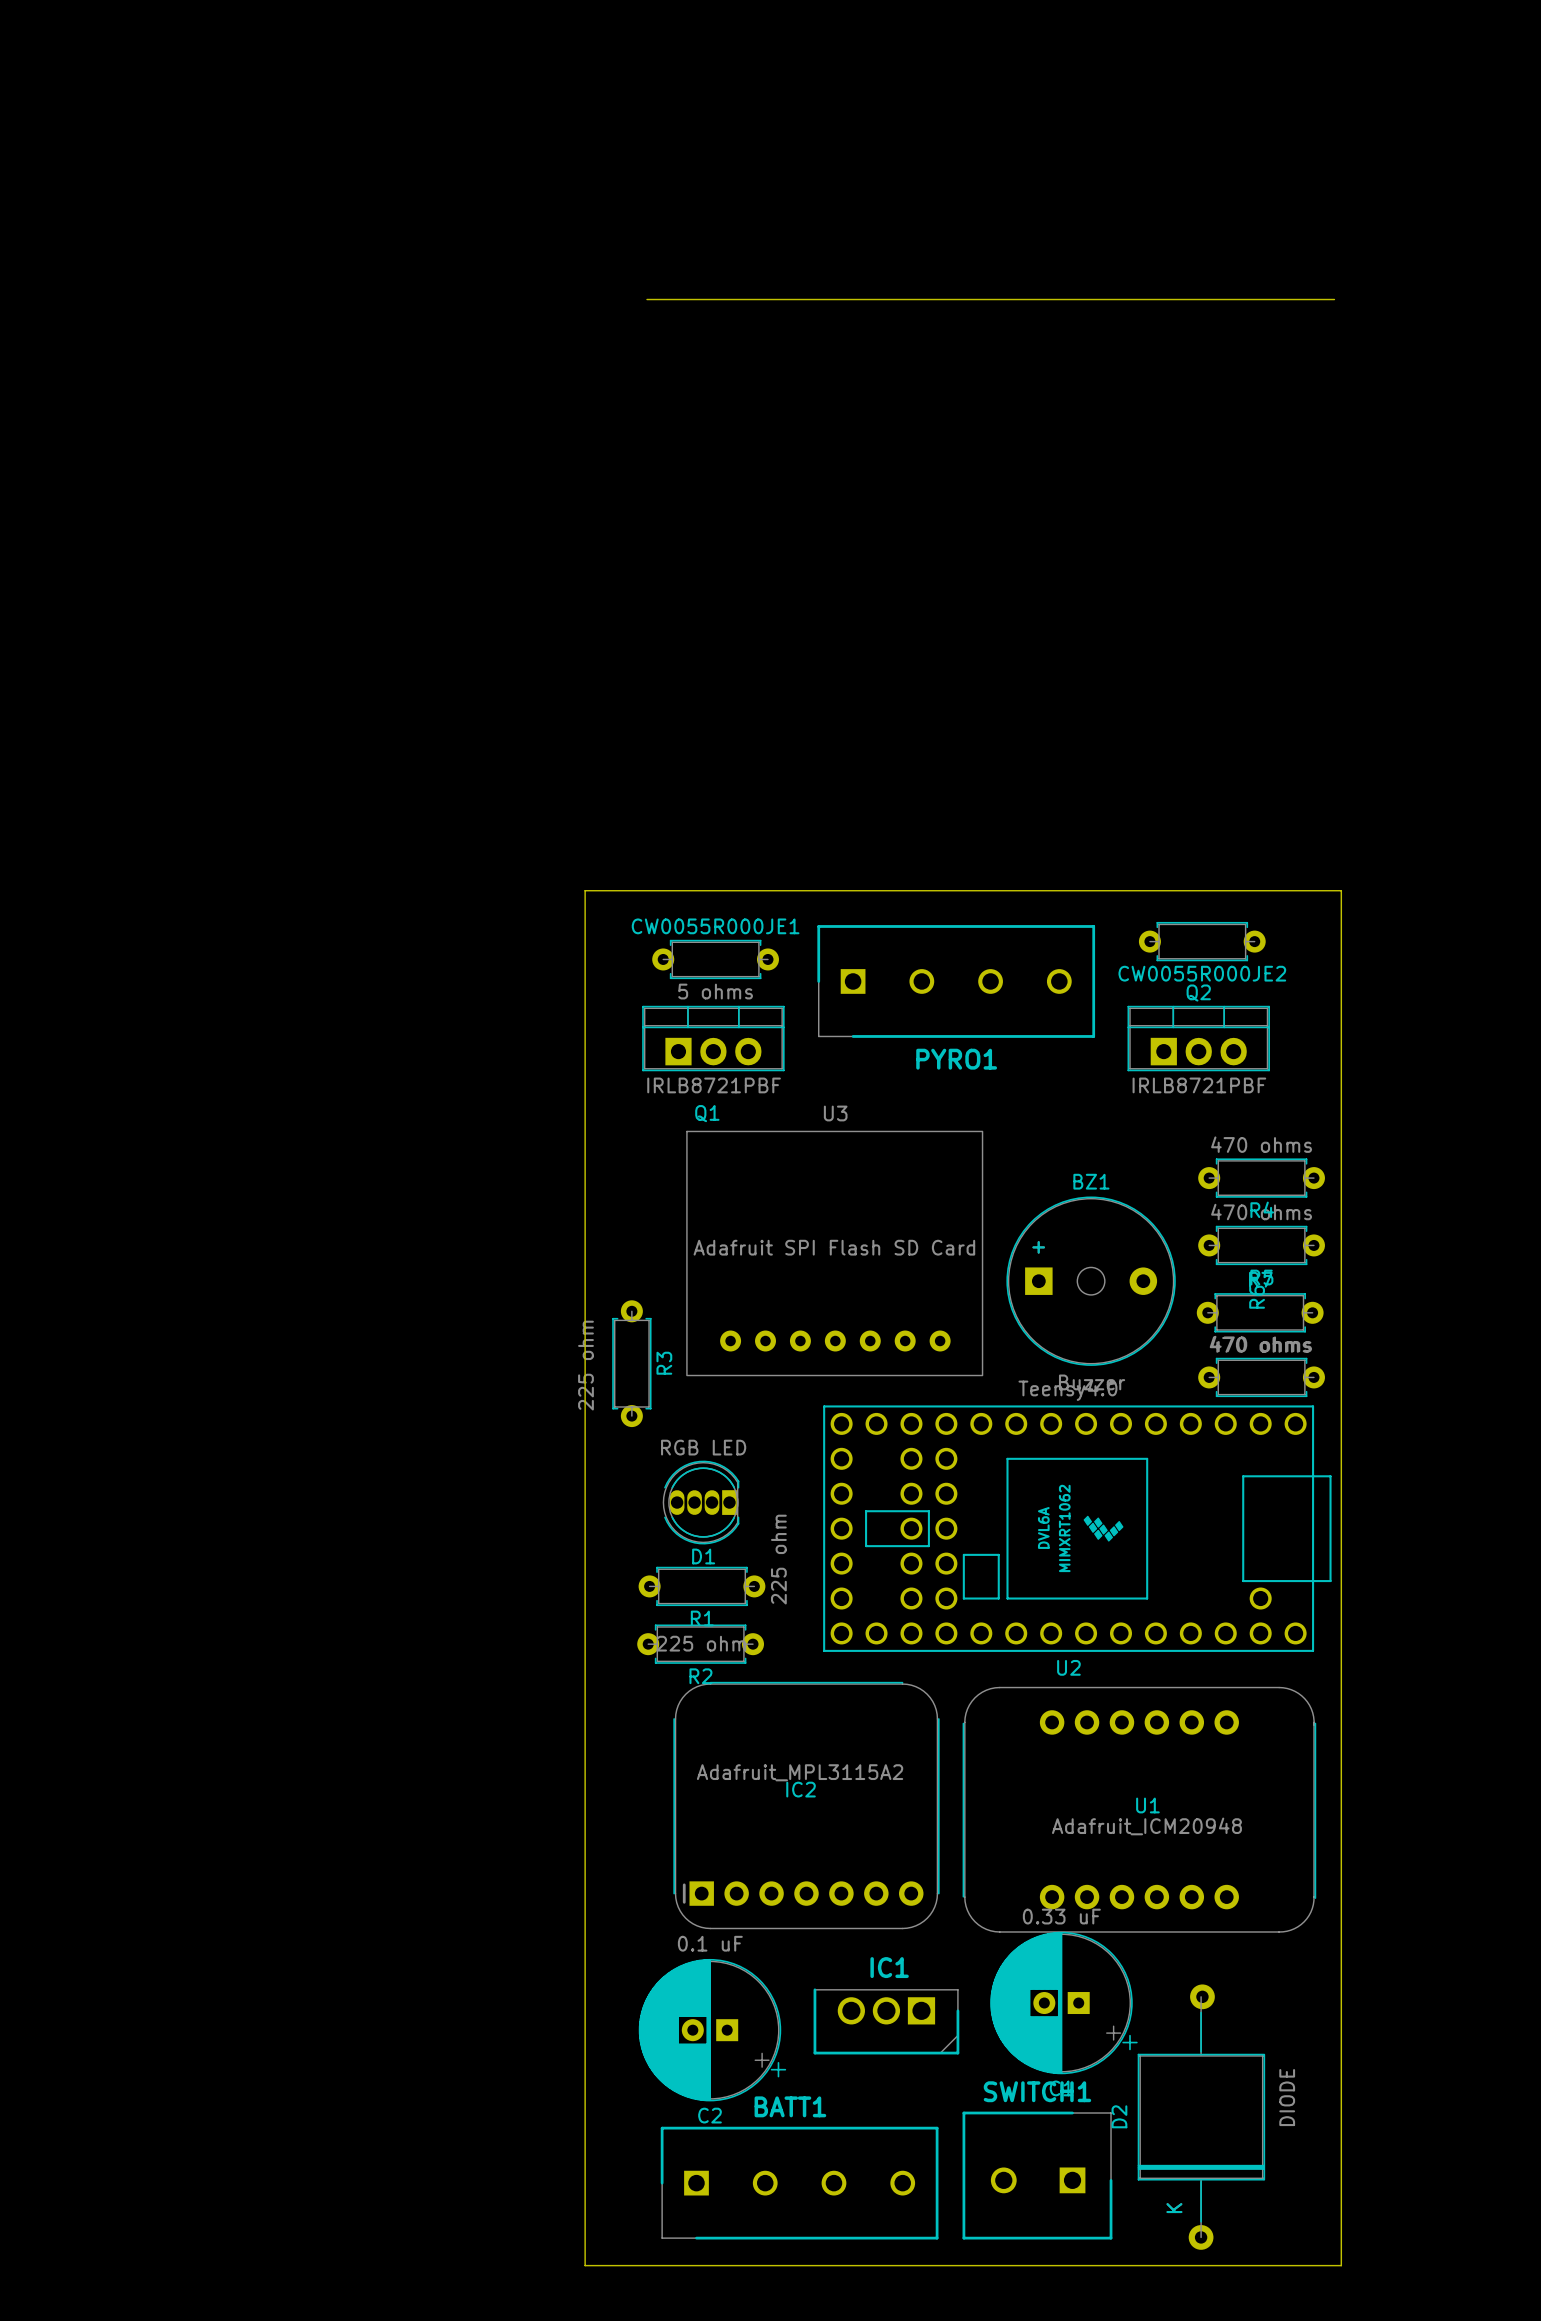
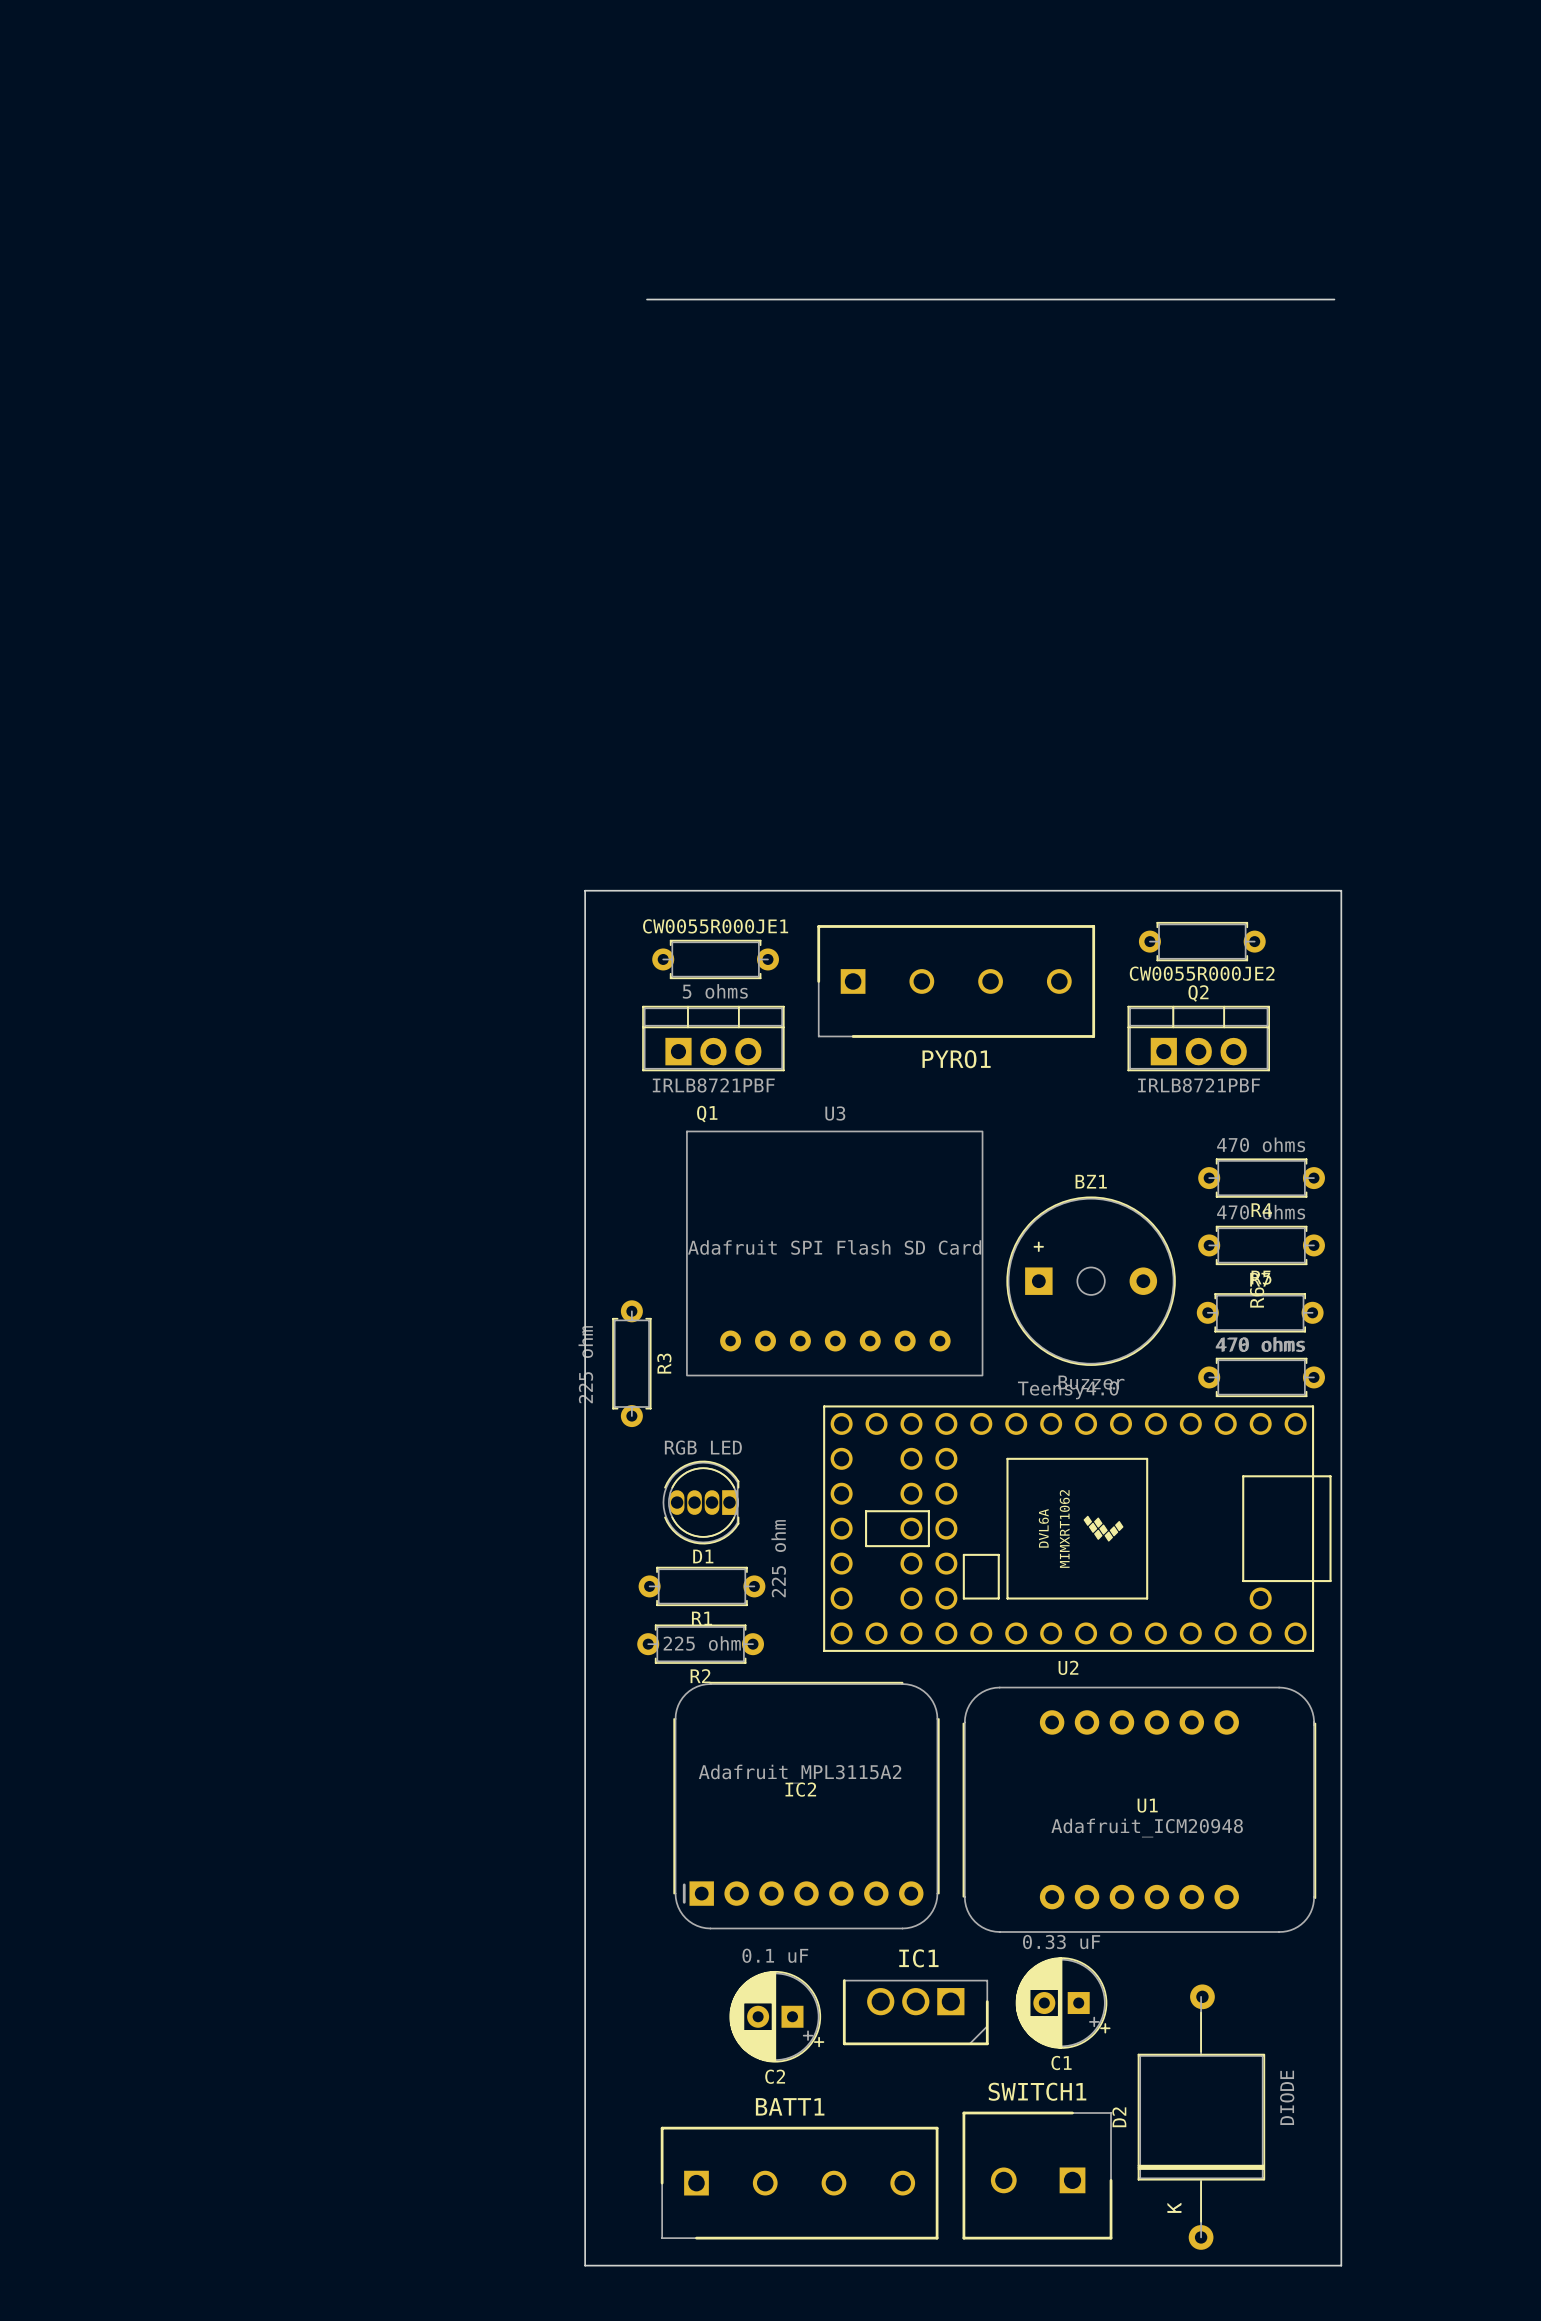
C1 footprint: [990, 1931, 1138, 2075] -> [1015, 1957, 1111, 2049]
C2 footprint: [638, 1958, 787, 2102] -> [729, 1970, 825, 2063]
IC1 position: (886, 2021) -> (915, 2012)

